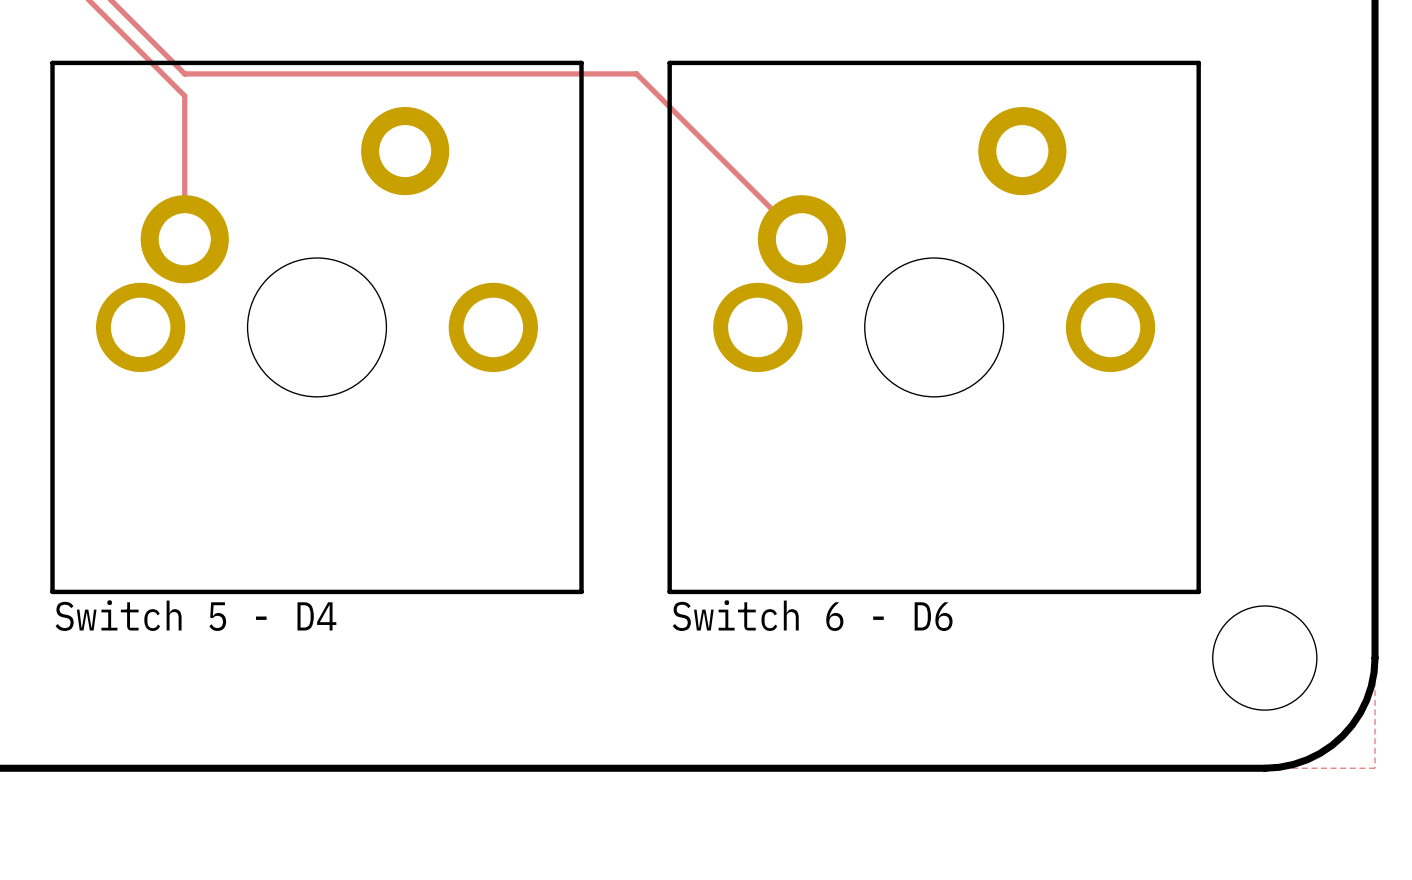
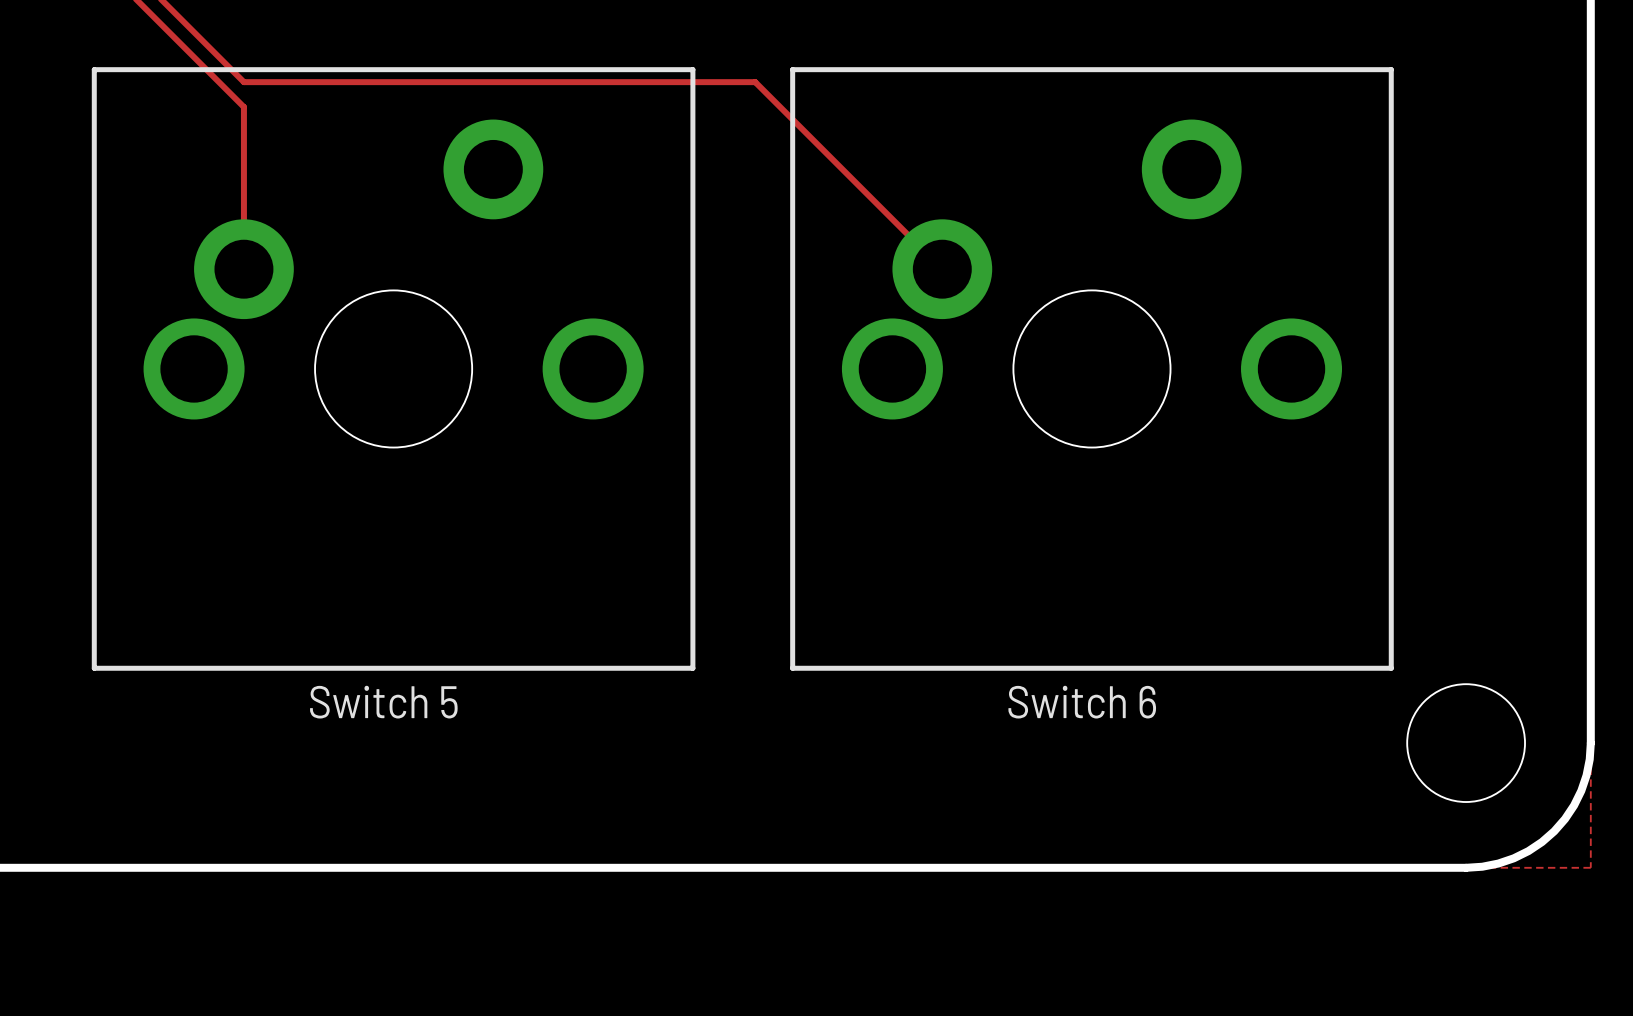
text: Switch 5 - D4 (195, 615) -> Switch 5 (383, 702)
text: Switch 6 - D6 (812, 615) -> Switch 6 (1082, 702)

